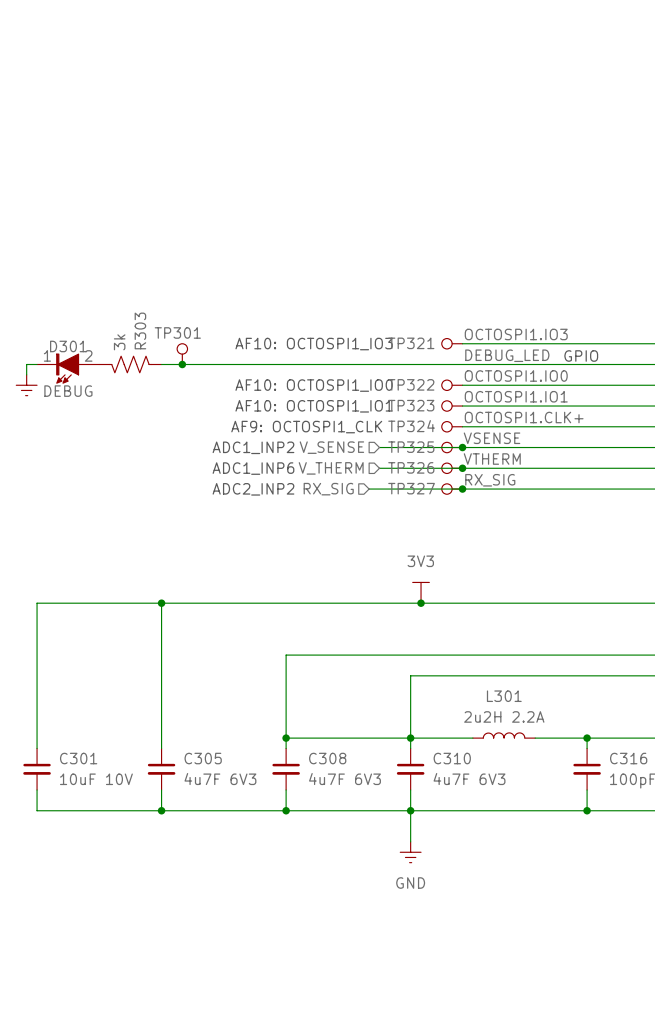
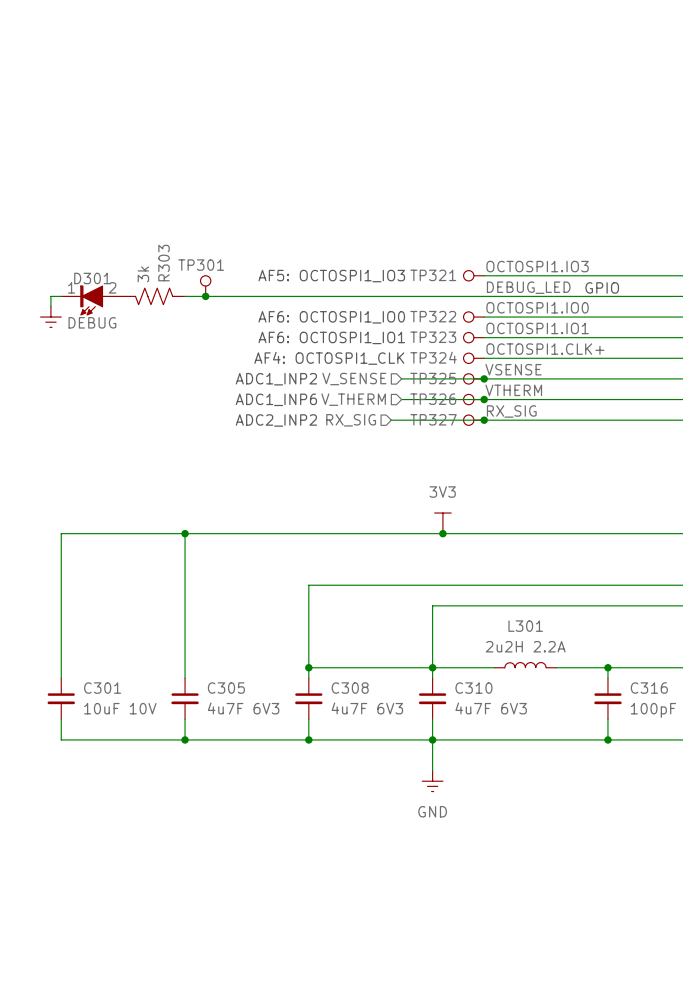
text: AF10: OCTOSPI1_IO3 (314, 344) -> AF5: OCTOSPI1_IO3 (331, 276)
text: AF10: OCTOSPI1_IO0 (314, 385) -> AF6: OCTOSPI1_IO0 (331, 317)
text: AF10: OCTOSPI1_IO1 (314, 406) -> AF6: OCTOSPI1_IO1 (331, 337)
text: AF9: OCTOSPI1_CLK (306, 427) -> AF4: OCTOSPI1_CLK (329, 358)

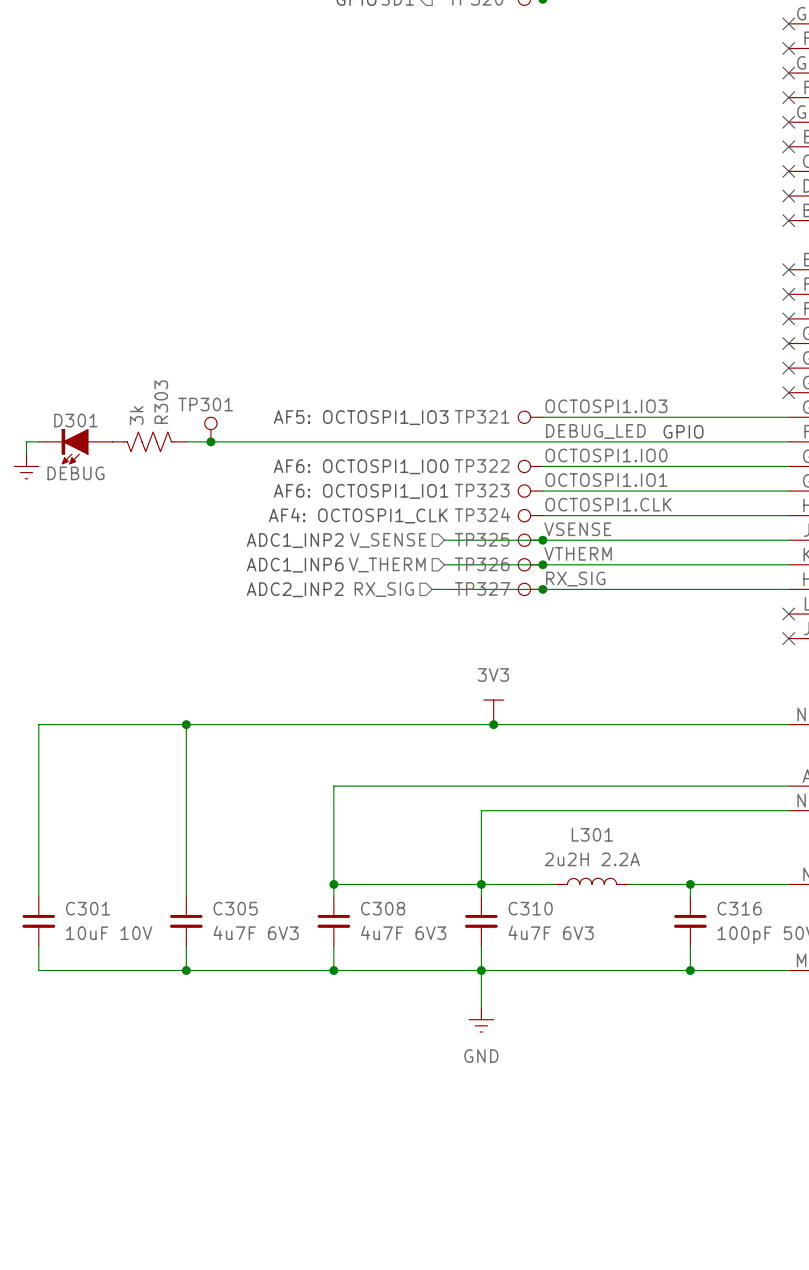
D301 pin number: 1 (71, 287) -> none
D301 pin number: 2 (112, 287) -> none
label: OCTOSPI1.CLK+ (545, 349) -> OCTOSPI1.CLK (608, 504)

